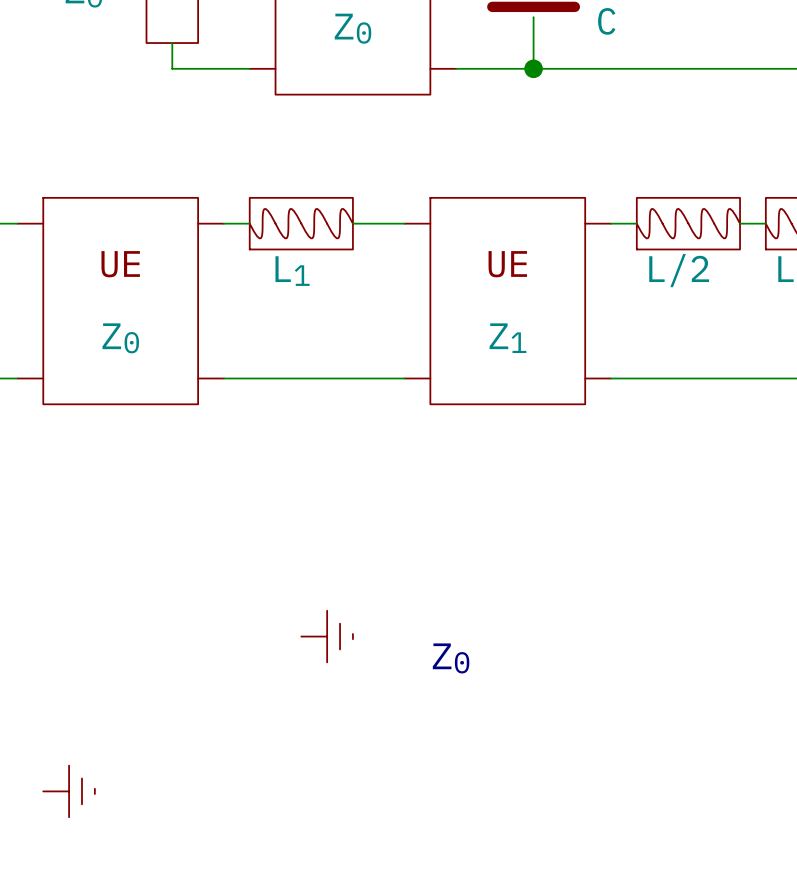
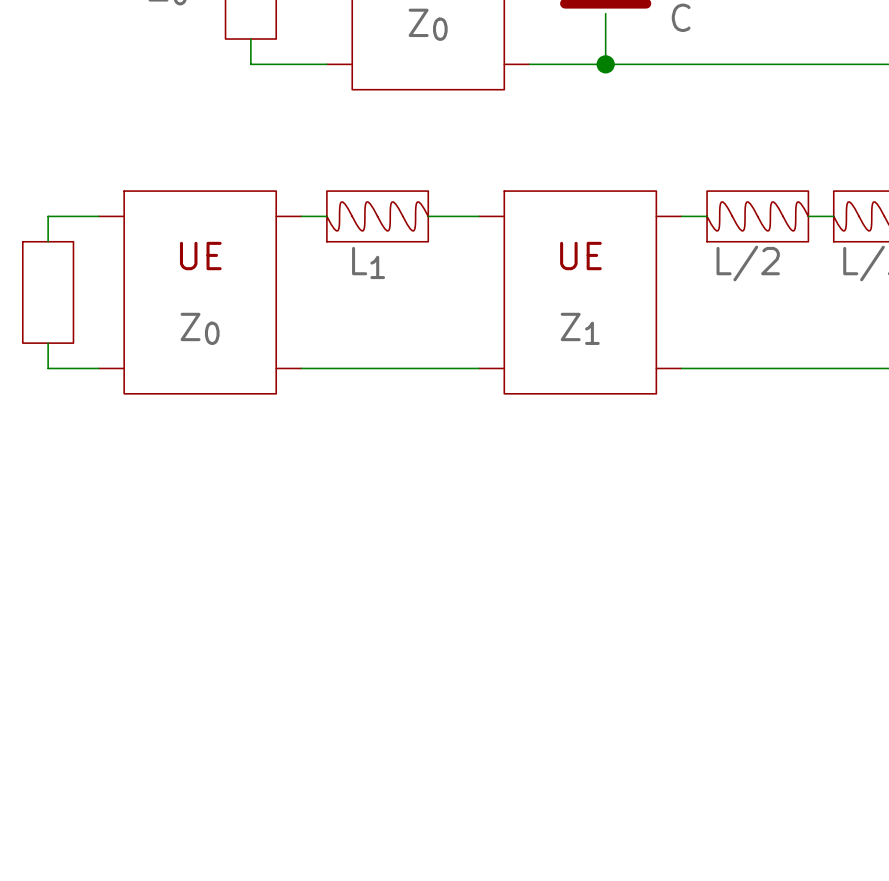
power symbol: (327, 636) -> none
text: Z0 (451, 658) -> none
power symbol: (69, 791) -> none

